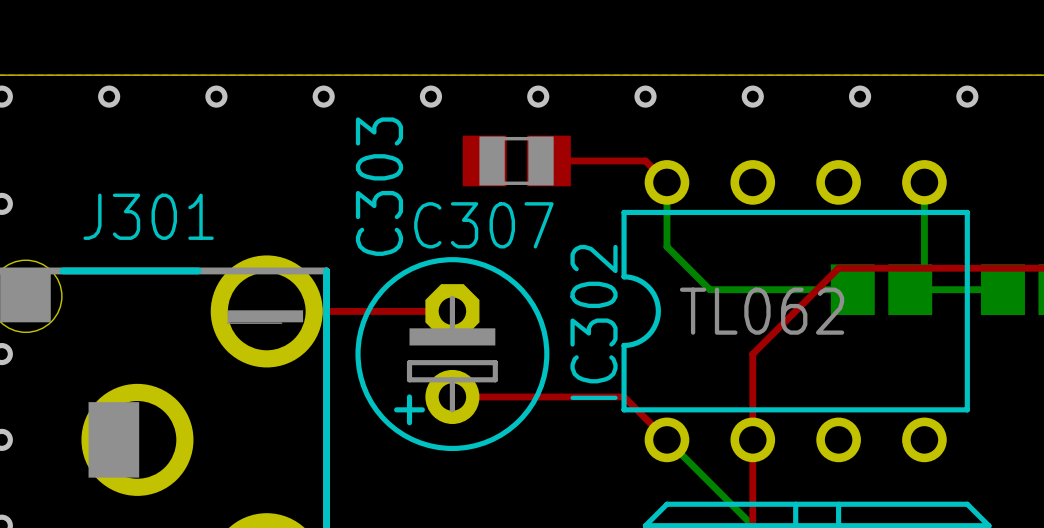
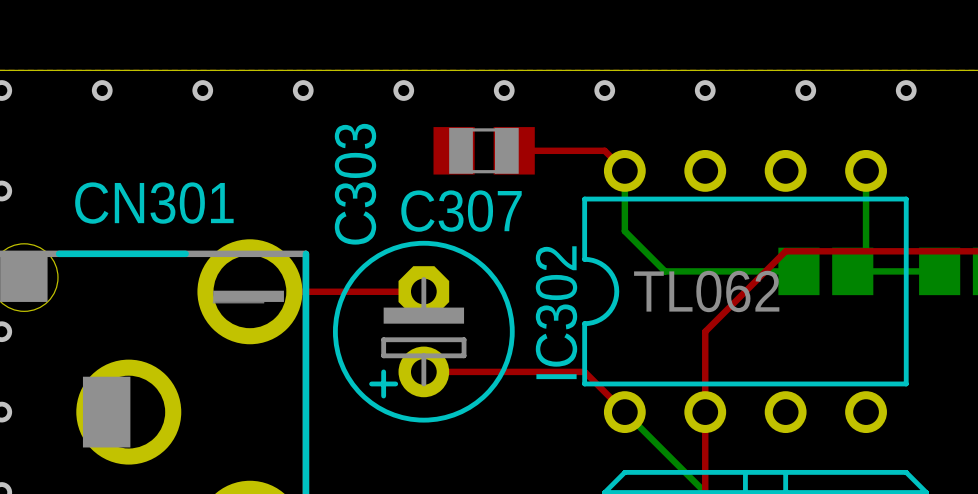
J301 name: J301 (148, 216) -> CN301 (154, 203)

